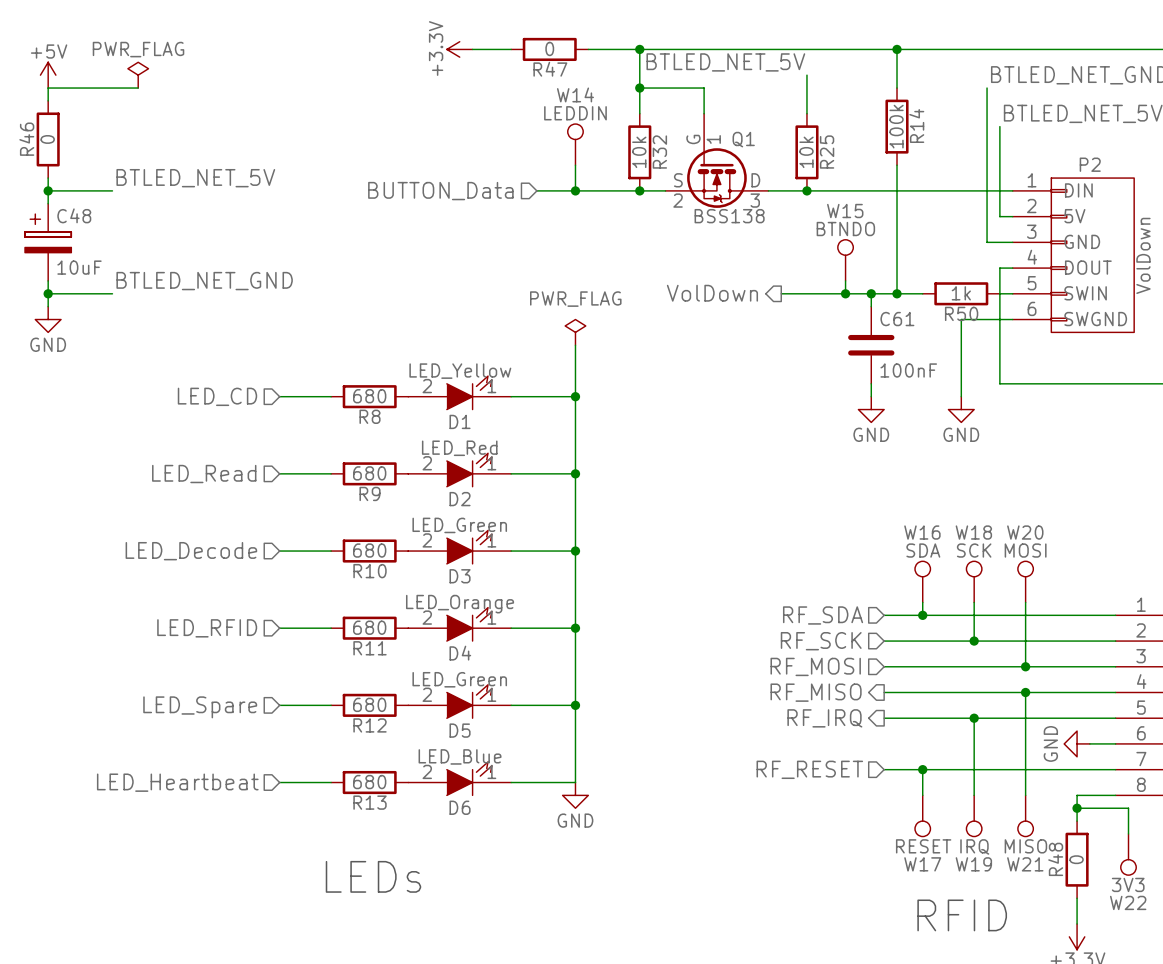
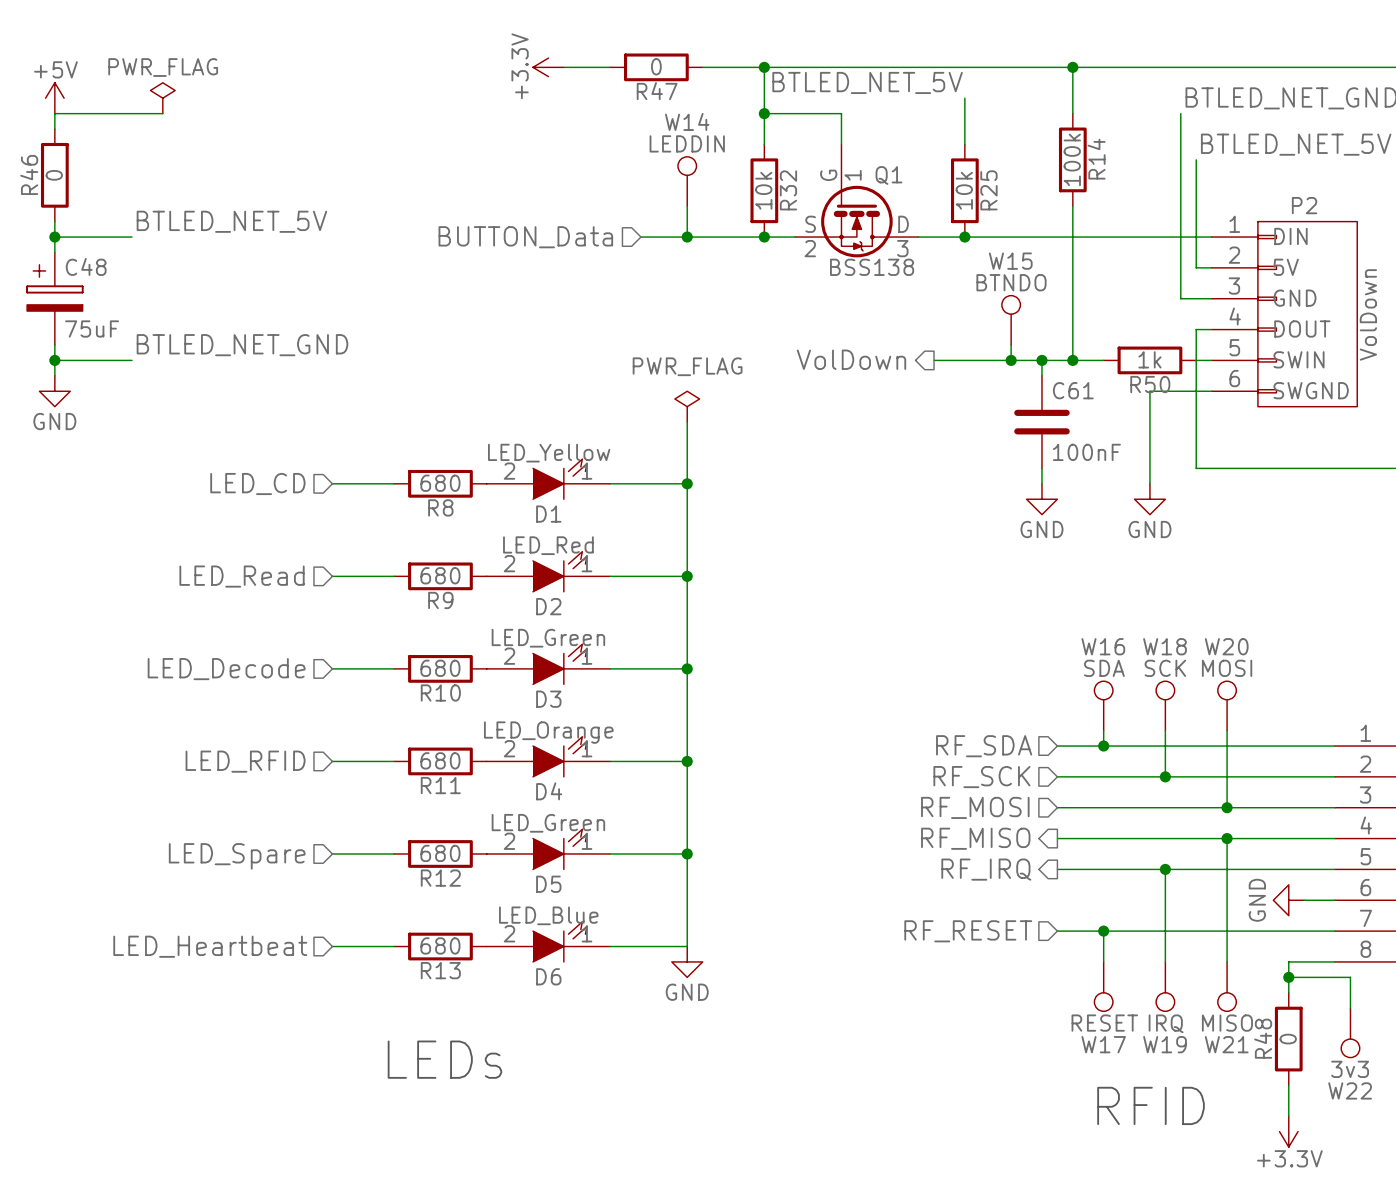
C48 value: 10uF (79, 267) -> 75uF (92, 329)
W22 value: 3V3 (1128, 884) -> 3v3 (1350, 1069)

